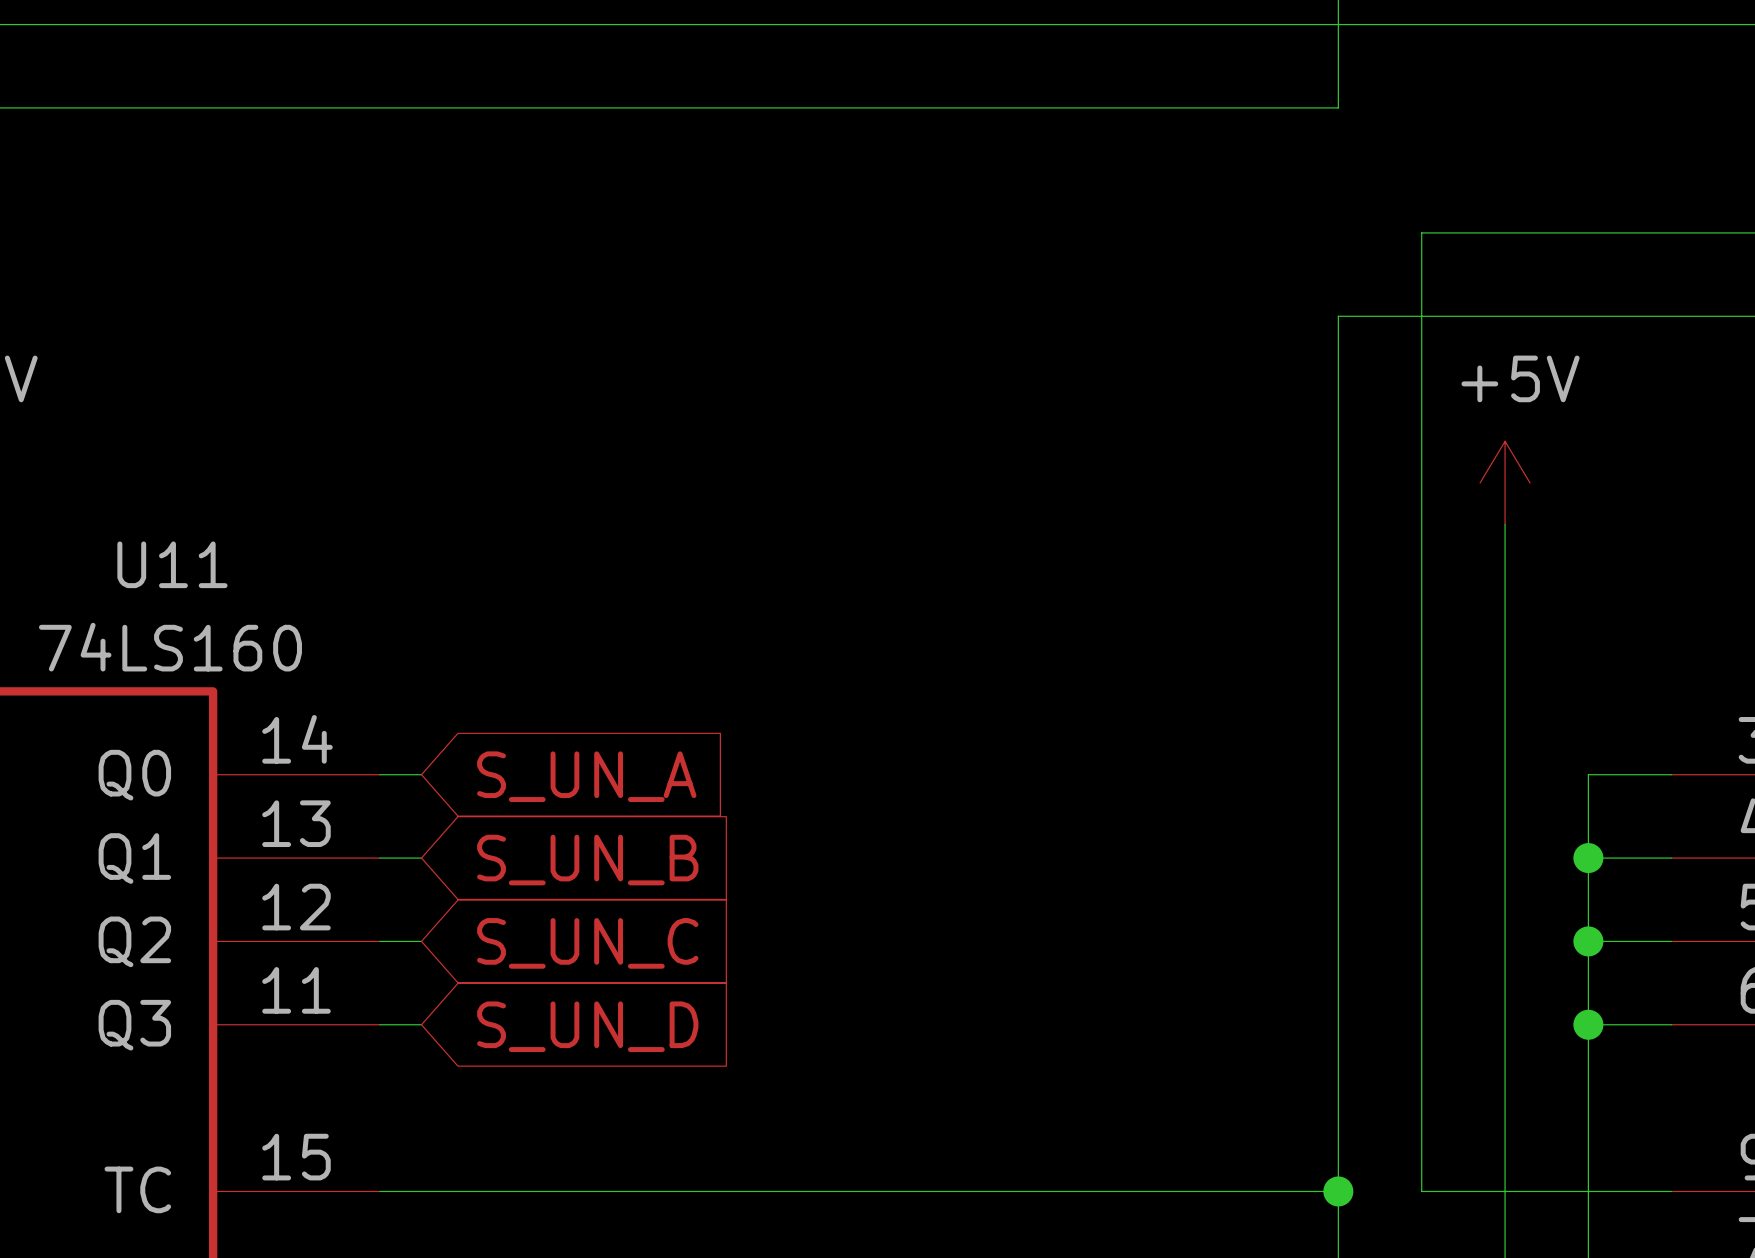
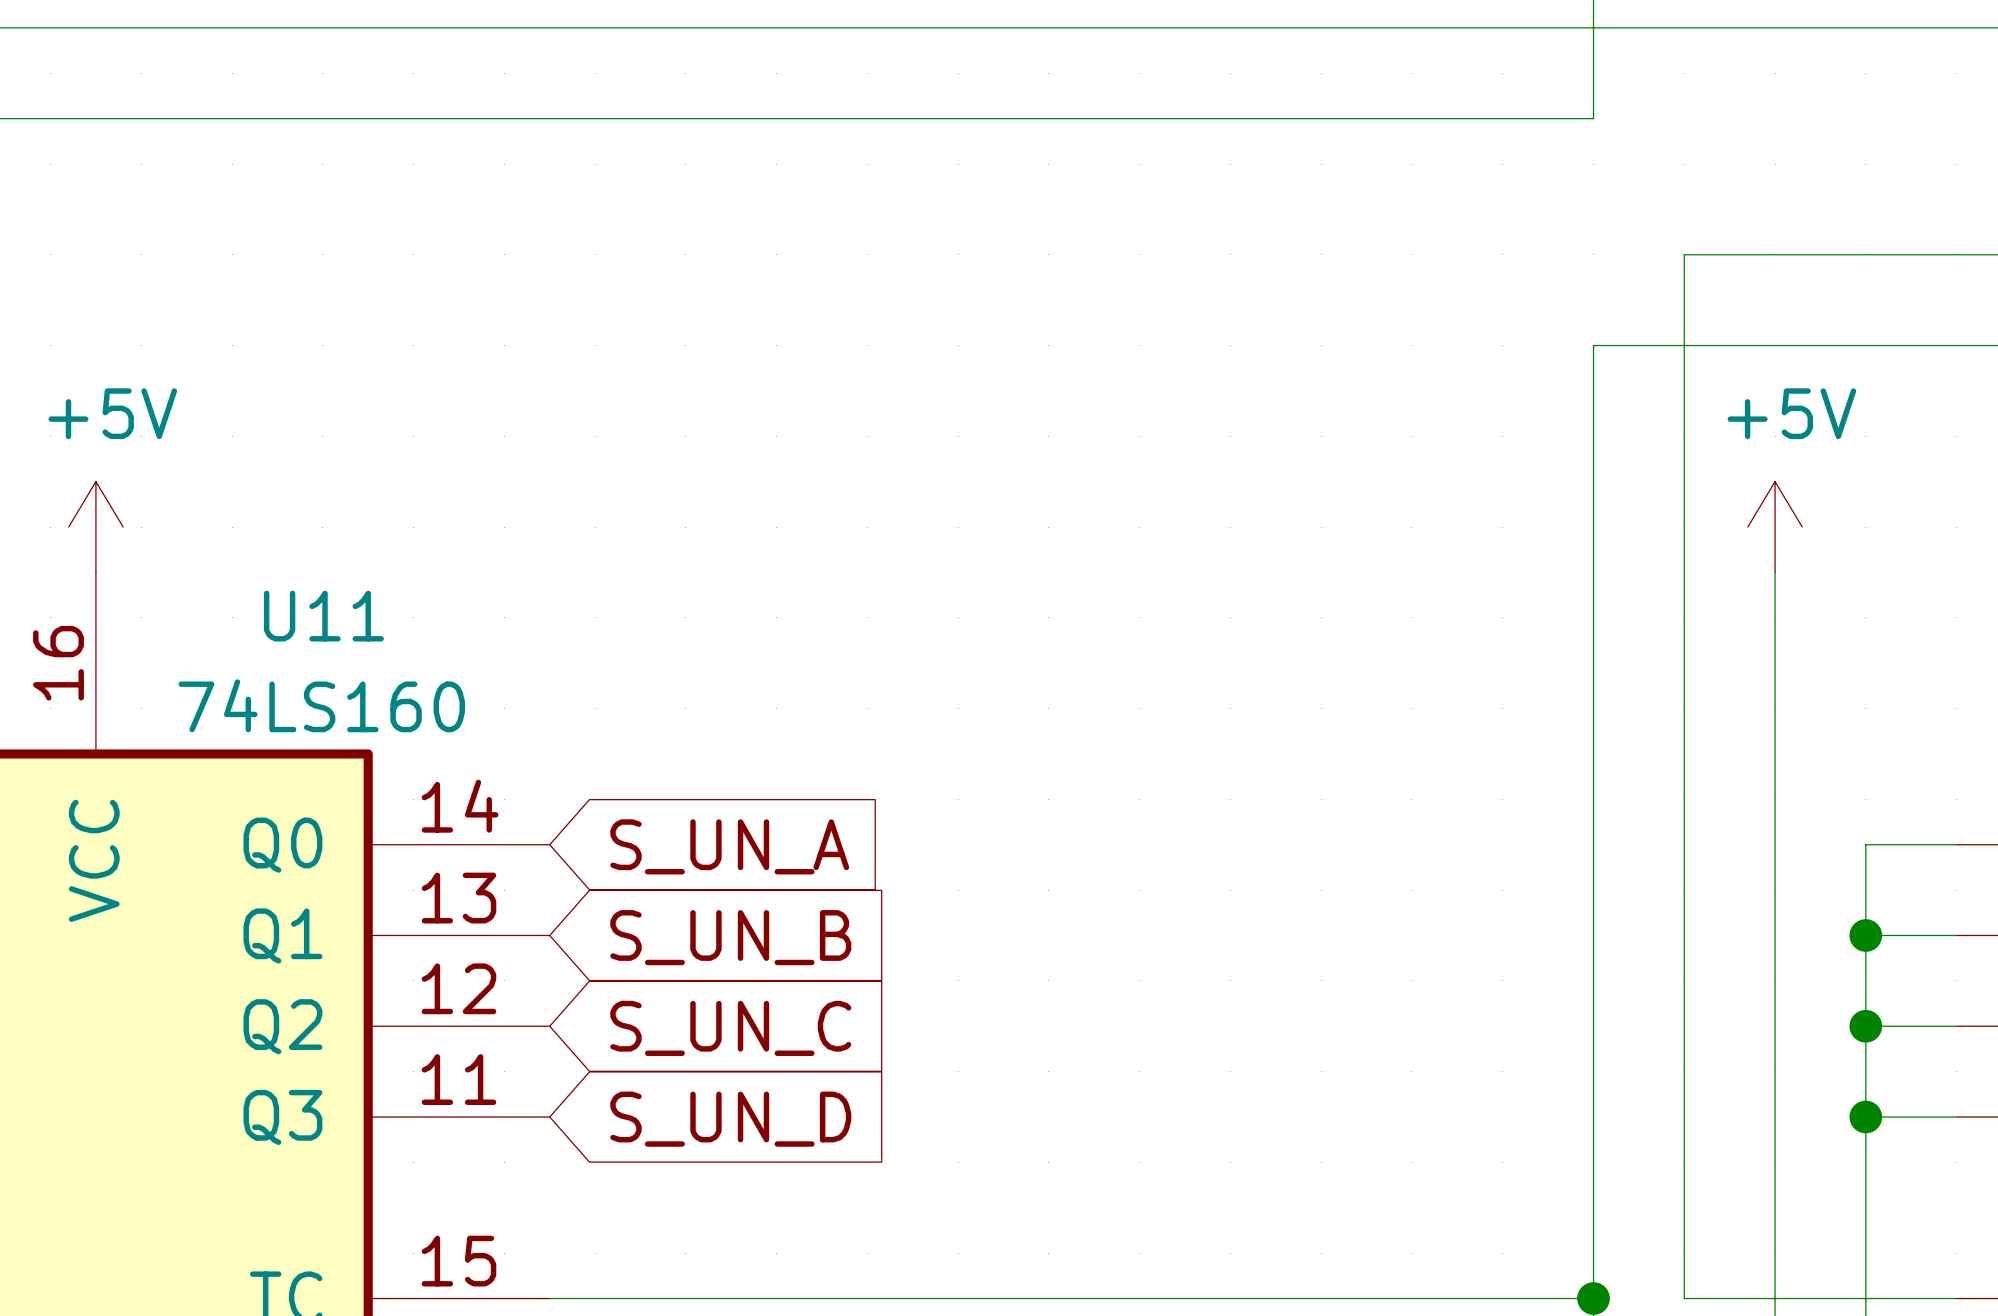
wire: (379, 774) (421, 774) -> none
global label position: S_UN_A (586, 776) -> S_UN_A (729, 846)
wire: (379, 858) (421, 858) -> none
global label position: S_UN_B (587, 860) -> S_UN_B (730, 937)
wire: (379, 941) (421, 941) -> none
global label position: S_UN_C (587, 943) -> S_UN_C (730, 1028)
wire: (379, 1024) (421, 1024) -> none
global label position: S_UN_D (587, 1026) -> S_UN_D (730, 1119)

